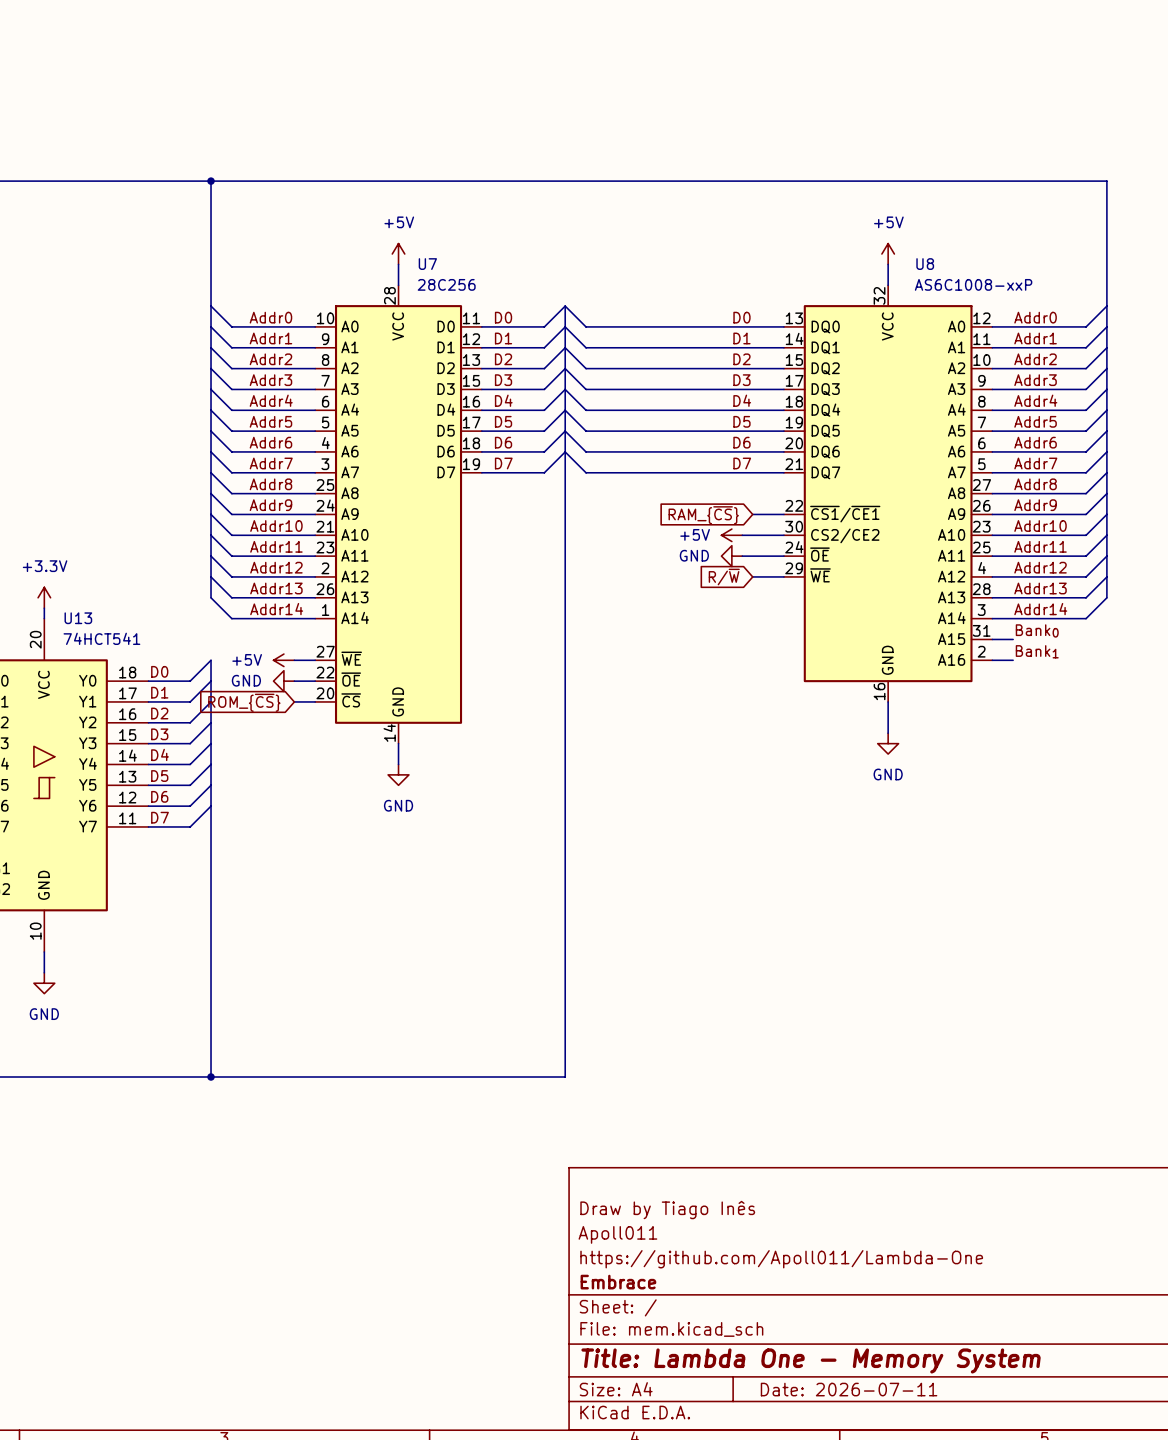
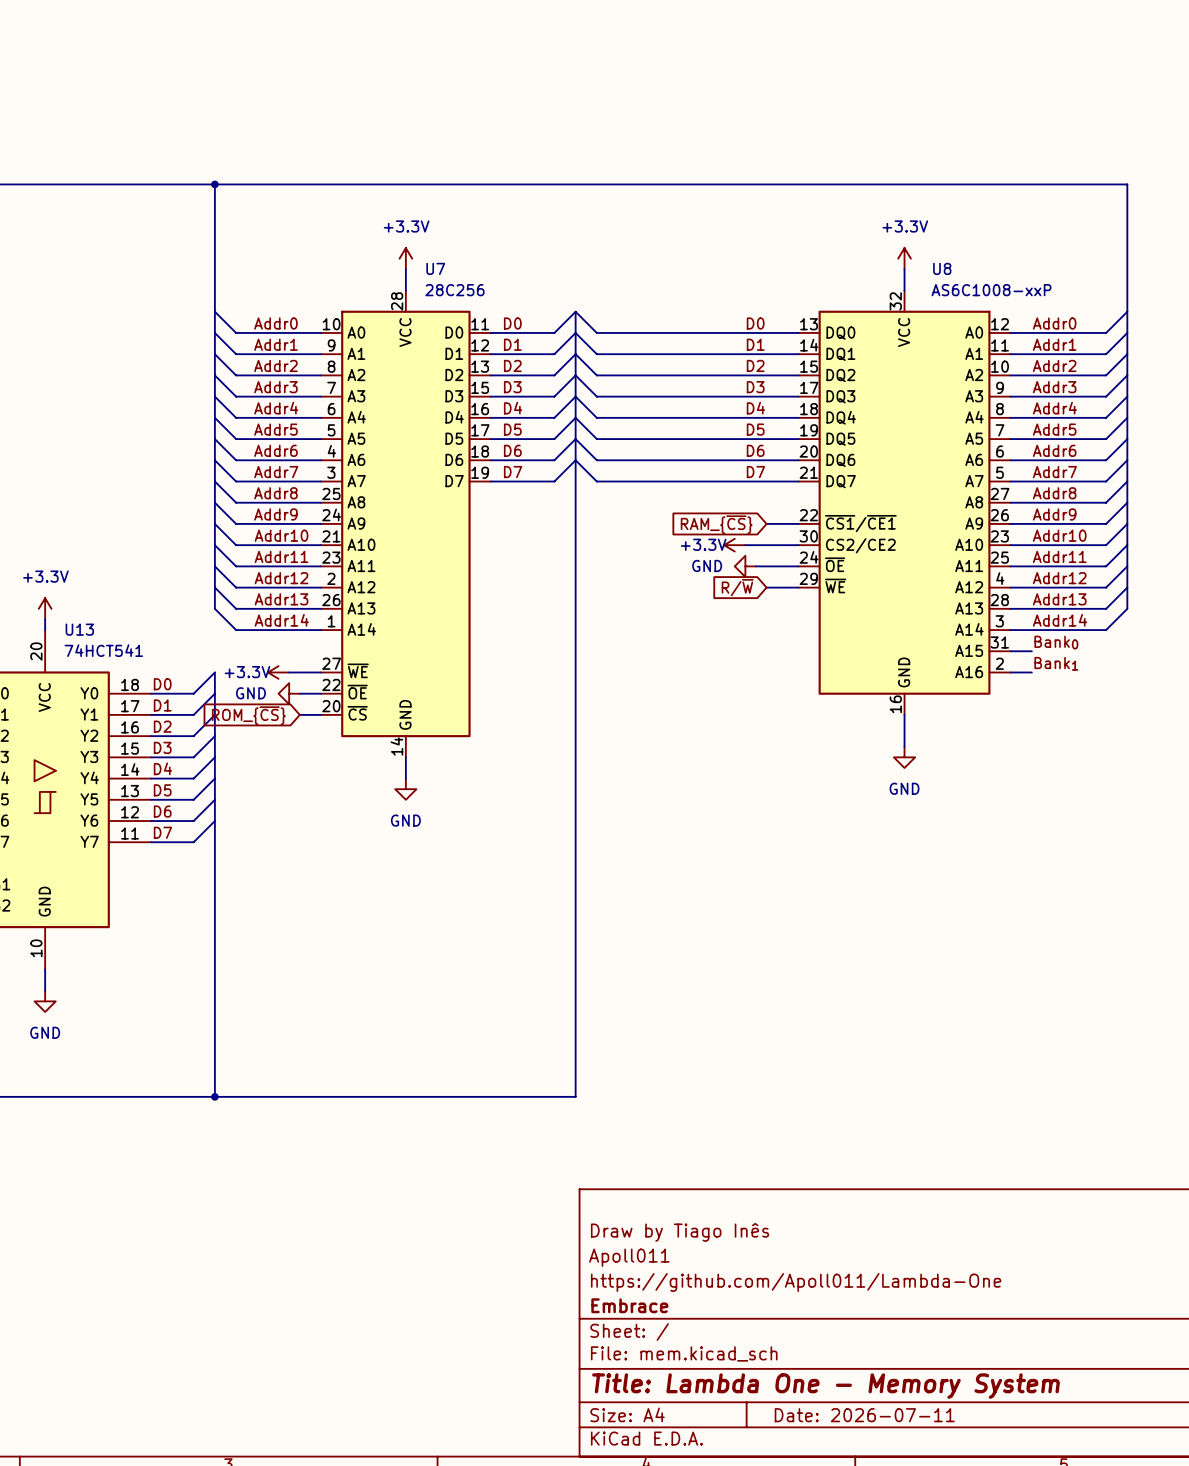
power symbol: +5V (398, 254) -> +3.3V (405, 258)
power symbol: +5V (888, 254) -> +3.3V (904, 258)
power symbol: none -> +3.3V (734, 545)
power symbol: +5V (731, 535) -> none
power symbol: none -> +3.3V (278, 672)
power symbol: +5V (283, 660) -> none

